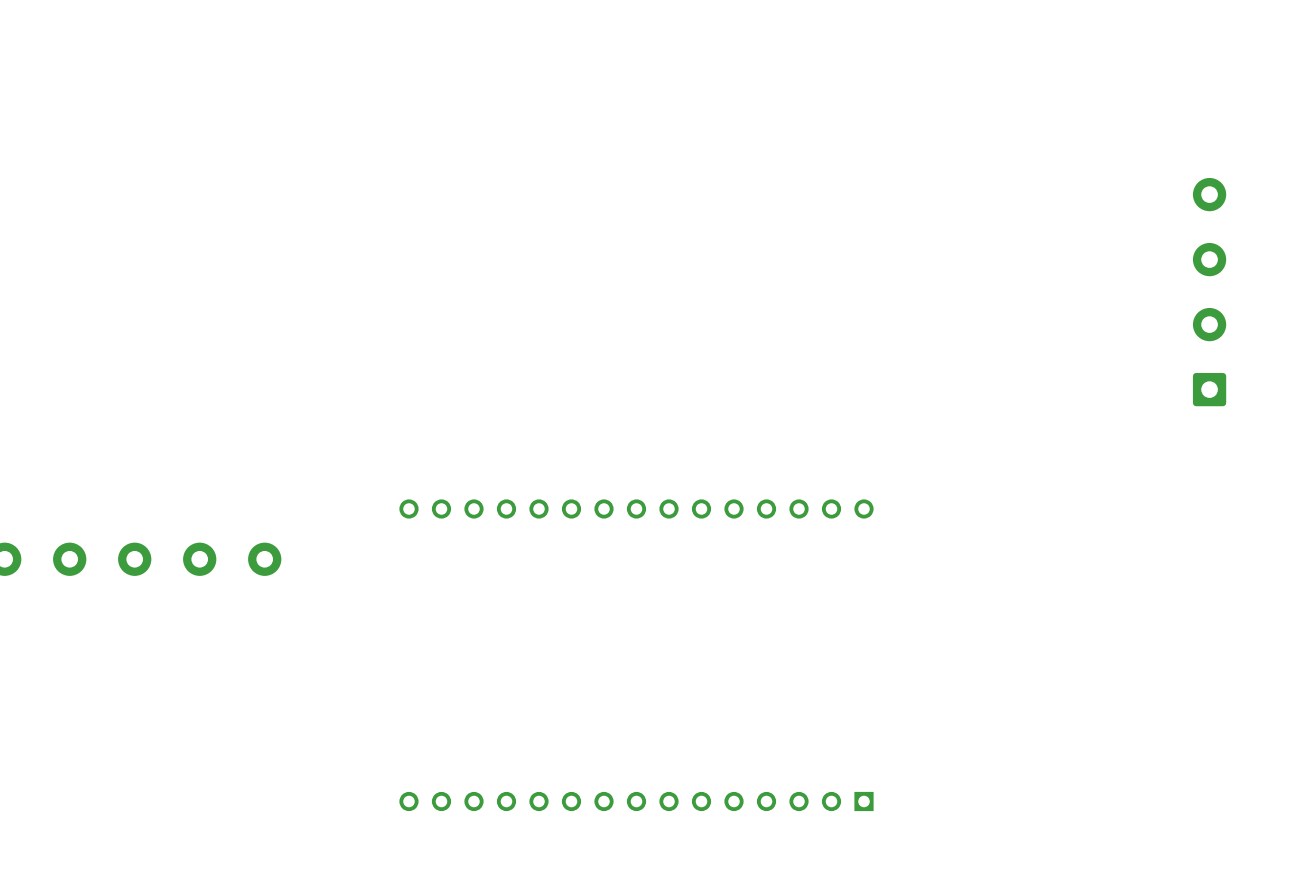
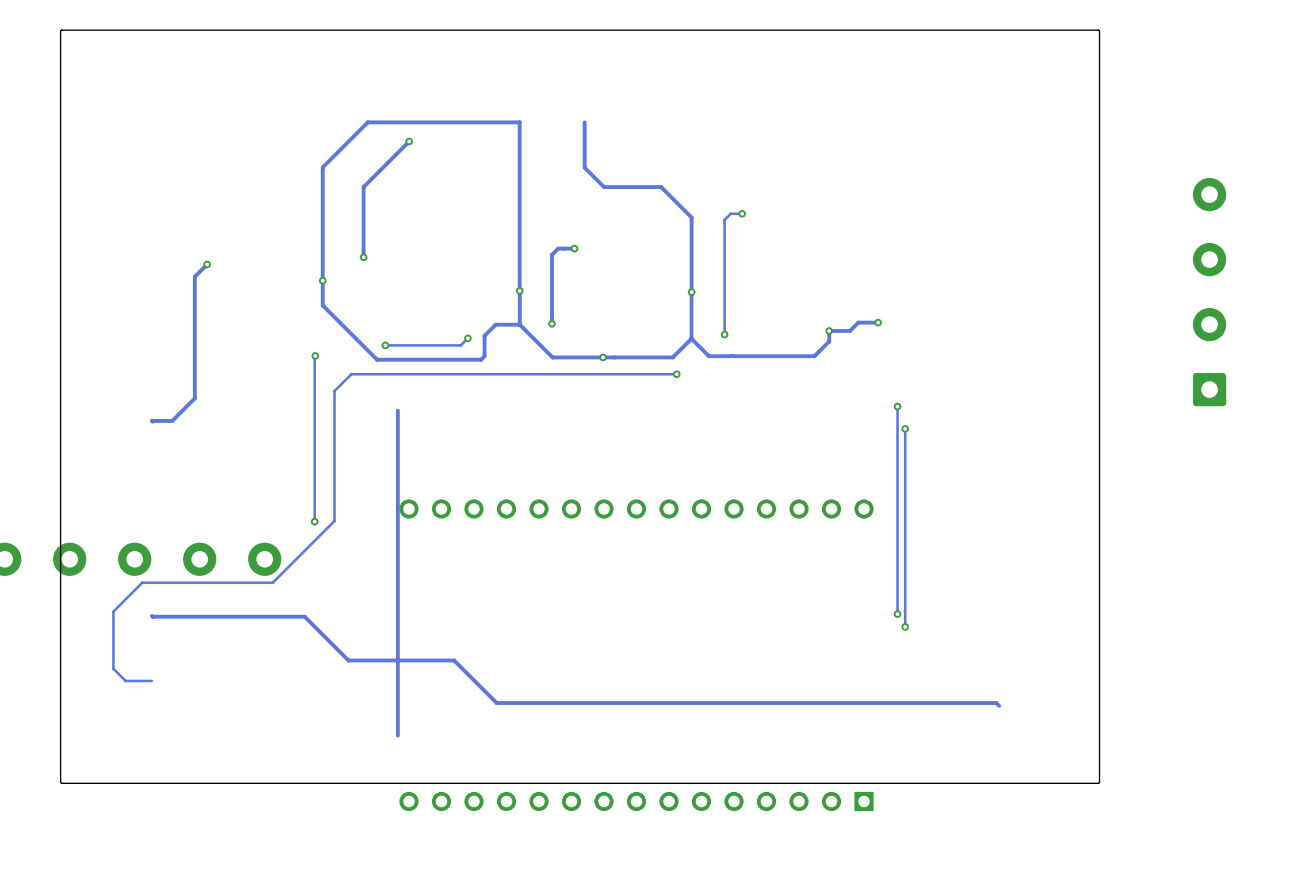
board edge: none -> (1098, 30) (61, 30) (60, 782) (1099, 783) (1098, 30)
track: none -> (584, 122) (584, 167) (604, 187) (661, 187) (691, 217) (691, 292)
track: none -> (409, 141) (363, 187) (363, 257)
via: none -> (409, 141)
track: none -> (742, 213) (730, 213) (724, 219) (724, 334)
via: none -> (742, 213)
track: none -> (574, 248) (558, 248) (551, 254) (551, 323)
via: none -> (574, 248)
via: none -> (363, 257)
track: none -> (207, 264) (194, 276) (194, 398) (172, 420) (152, 421)
via: none -> (207, 264)
via: none -> (322, 280)
track: none -> (519, 290) (519, 122) (367, 122) (322, 167) (322, 305) (377, 359) (481, 359) (484, 356) (484, 335) (495, 324) (519, 324)
track: none -> (519, 290) (519, 324)
via: none -> (519, 290)
track: none -> (691, 292) (691, 338)
via: none -> (691, 292)
track: none -> (878, 322) (858, 322) (849, 330) (829, 330) (829, 341) (814, 356) (708, 356) (691, 338)
via: none -> (878, 322)
via: none -> (551, 323)
track: none -> (519, 324) (552, 357) (672, 357) (691, 338)
via: none -> (829, 330)
via: none -> (724, 334)
track: none -> (467, 338) (460, 345) (385, 345)
via: none -> (467, 338)
via: none -> (385, 345)
track: none -> (315, 355) (314, 521)
via: none -> (315, 355)
via: none -> (603, 357)
track: none -> (676, 374) (351, 374) (334, 391) (334, 521) (272, 582) (142, 582) (113, 611) (113, 668) (125, 680) (151, 680)
via: none -> (676, 374)
track: none -> (897, 406) (897, 614)
via: none -> (897, 406)
track: none -> (397, 410) (397, 735)
track: none -> (905, 428) (905, 626)
via: none -> (905, 428)
via: none -> (314, 521)
via: none -> (897, 614)
track: none -> (151, 615) (304, 616) (348, 660) (454, 660) (496, 703) (996, 703) (999, 705)
via: none -> (905, 626)

